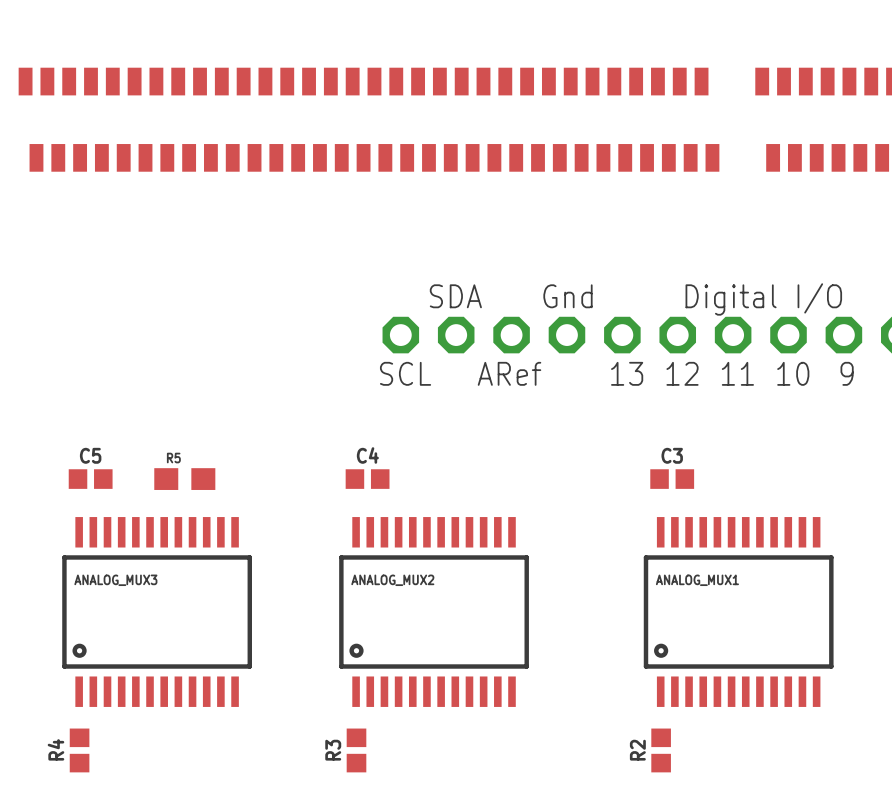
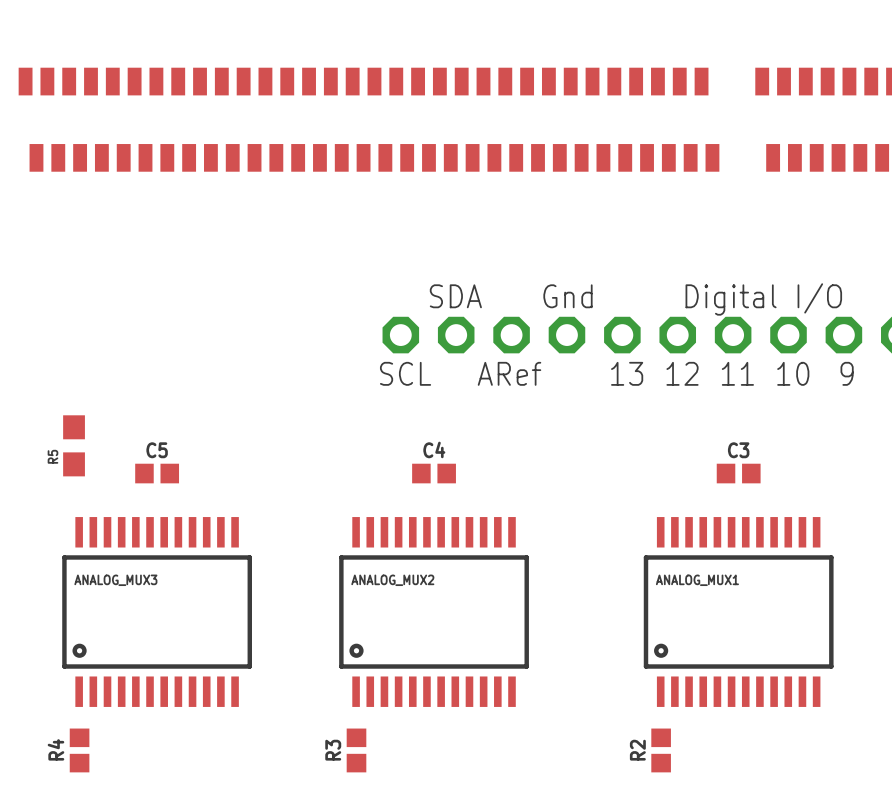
C5 position: (90, 479) -> (157, 473)
R5 rotation: 0° (184, 479) -> 90° clockwise (74, 445)
R5 position: (184, 479) -> (74, 445)
C4 position: (367, 479) -> (434, 473)
C3 position: (672, 479) -> (738, 473)

